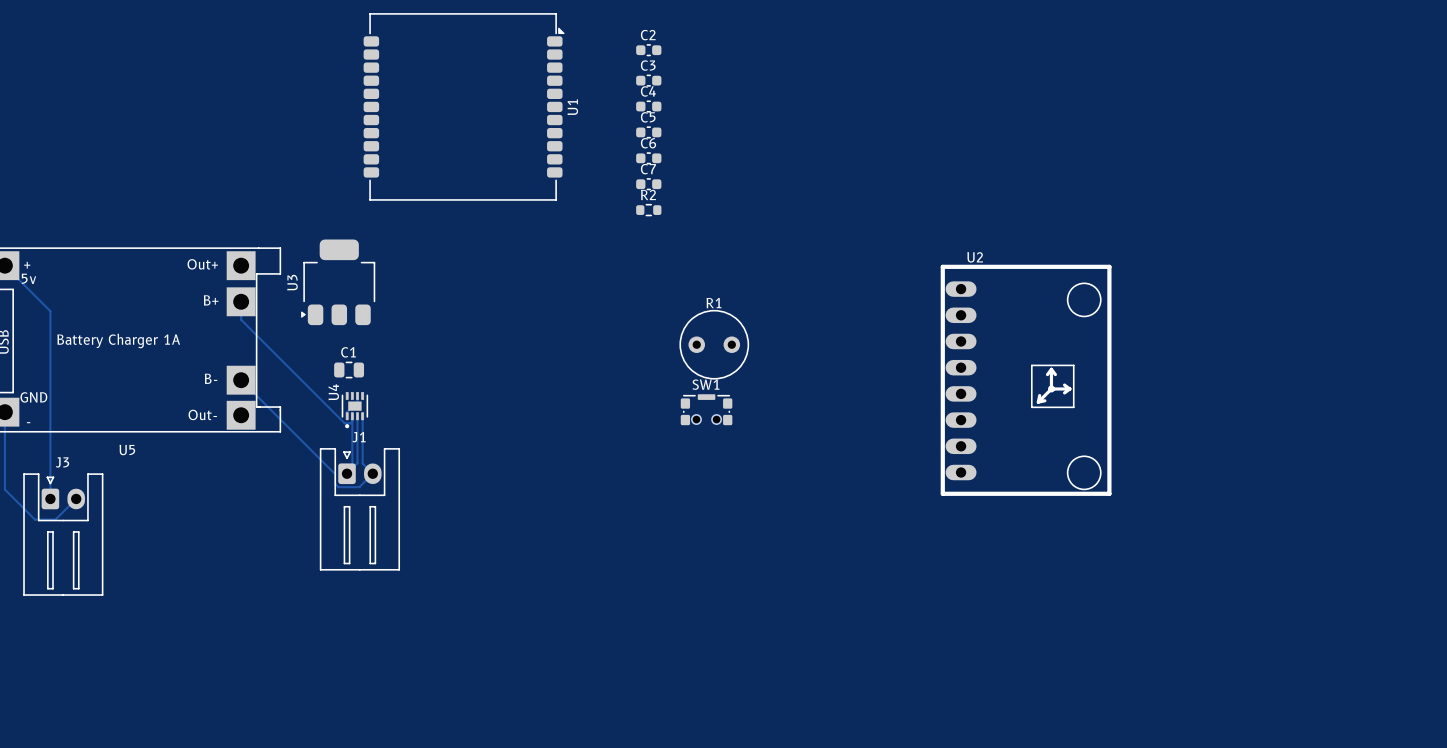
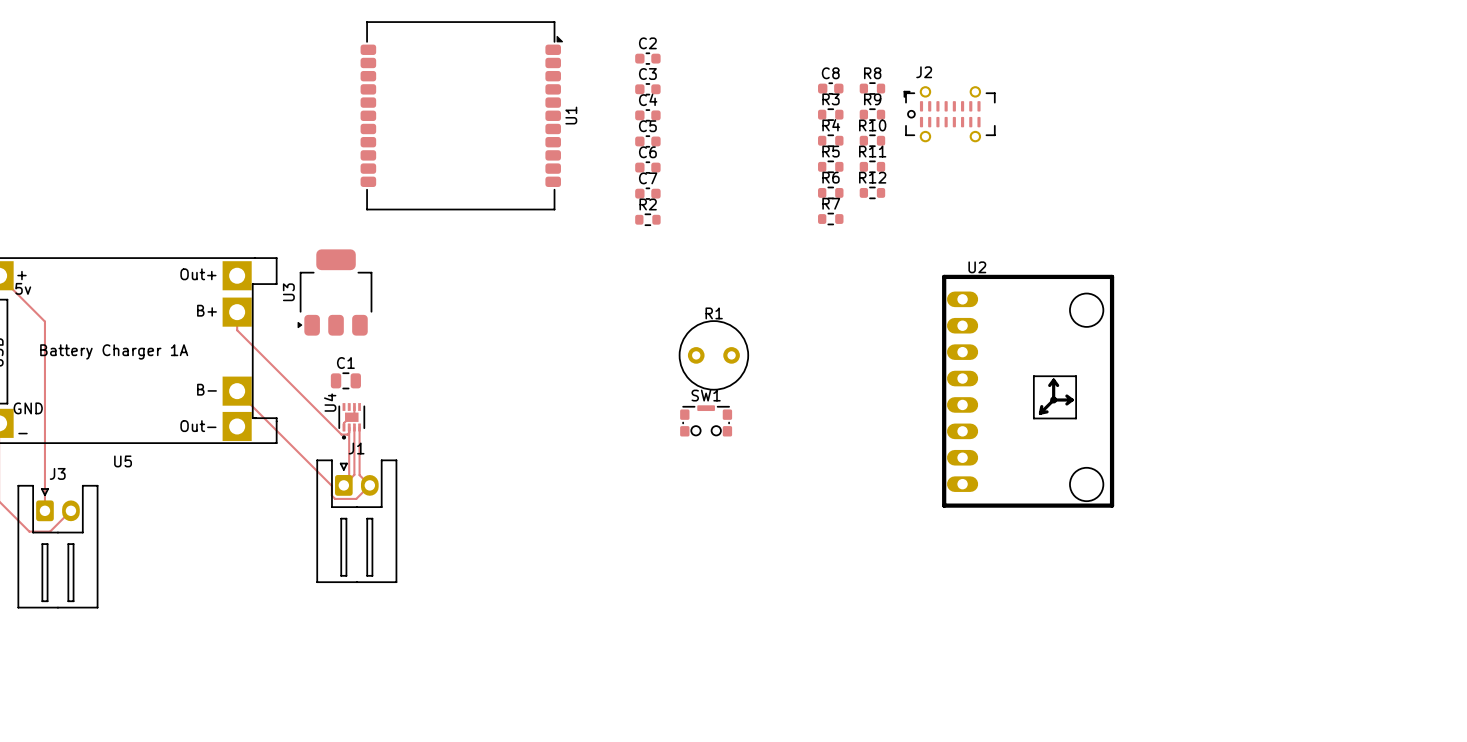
C8: none -> (830, 88)
R8: none -> (872, 88)
R3: none -> (830, 114)
R9: none -> (872, 114)
J2: none -> (949, 114)
R4: none -> (830, 140)
R10: none -> (872, 140)
R5: none -> (830, 166)
R11: none -> (872, 166)
R6: none -> (830, 192)
R12: none -> (872, 192)
R7: none -> (830, 219)

